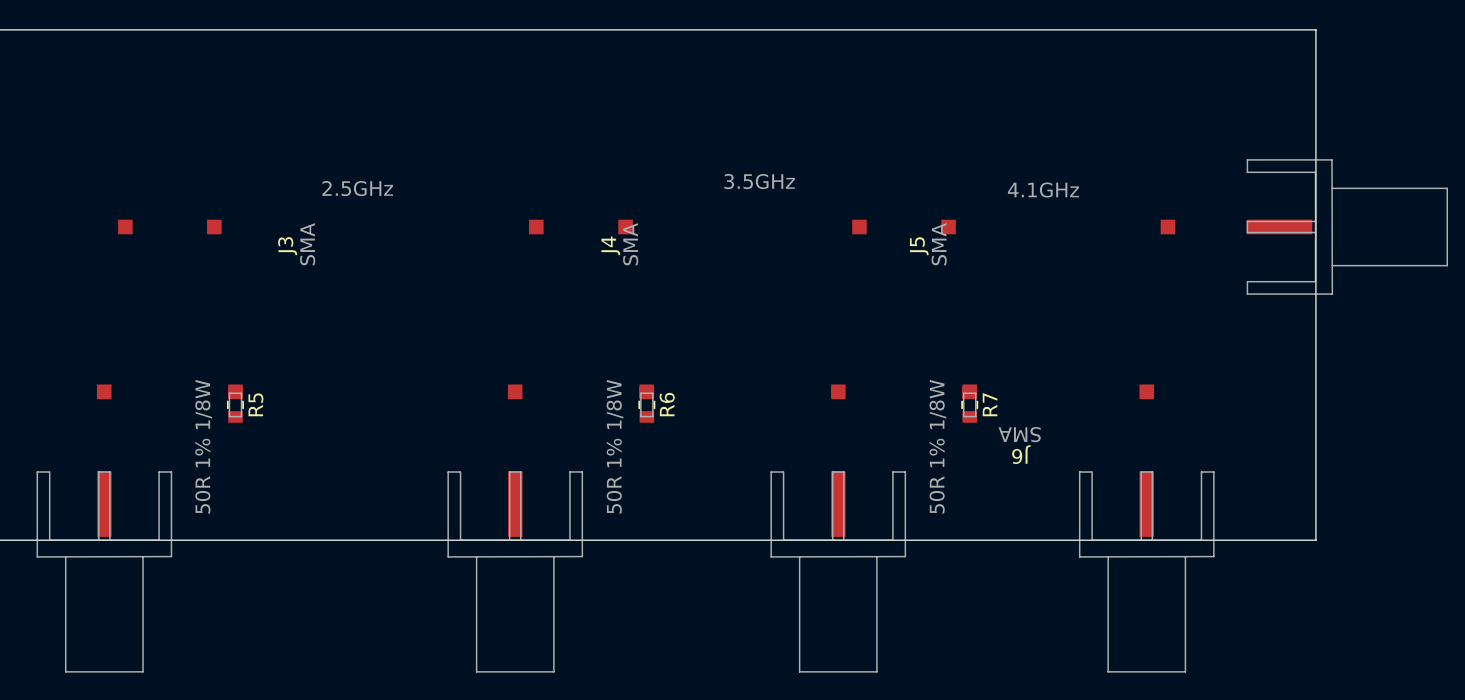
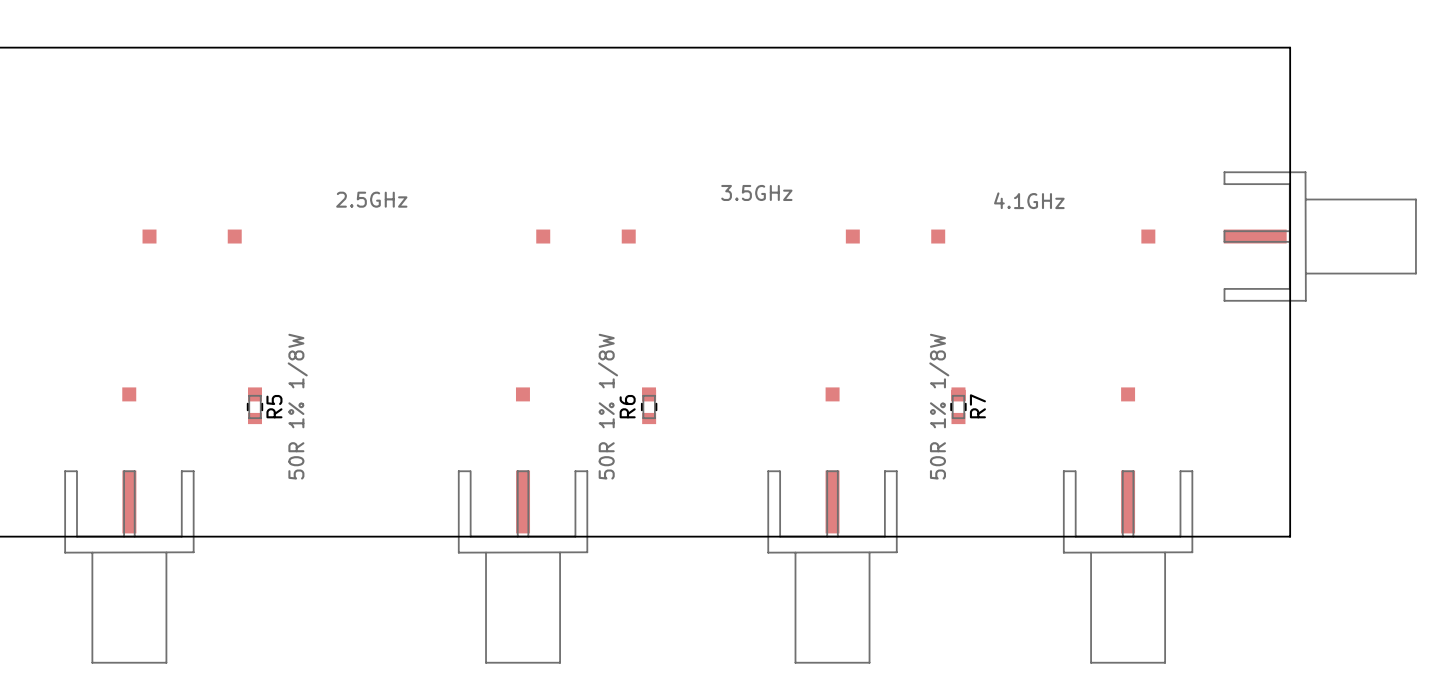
J3 value: SMA (307, 244) -> none
J4 value: SMA (630, 244) -> none
J5 value: SMA (939, 244) -> none
J4 name: J4 (610, 245) -> none
J3 name: J3 (287, 246) -> none
J5 name: J5 (919, 246) -> none
R6 name position: R6 (667, 404) -> R6 (627, 406)
J6 value: SMA (1019, 434) -> none
R5 value position: 50R 1% 1/8W (203, 446) -> 50R 1% 1/8W (297, 406)
R6 value position: 50R 1% 1/8W (615, 446) -> 50R 1% 1/8W (608, 406)
R7 value position: 50R 1% 1/8W (937, 446) -> 50R 1% 1/8W (939, 406)
J6 name: J6 (1021, 454) -> none

